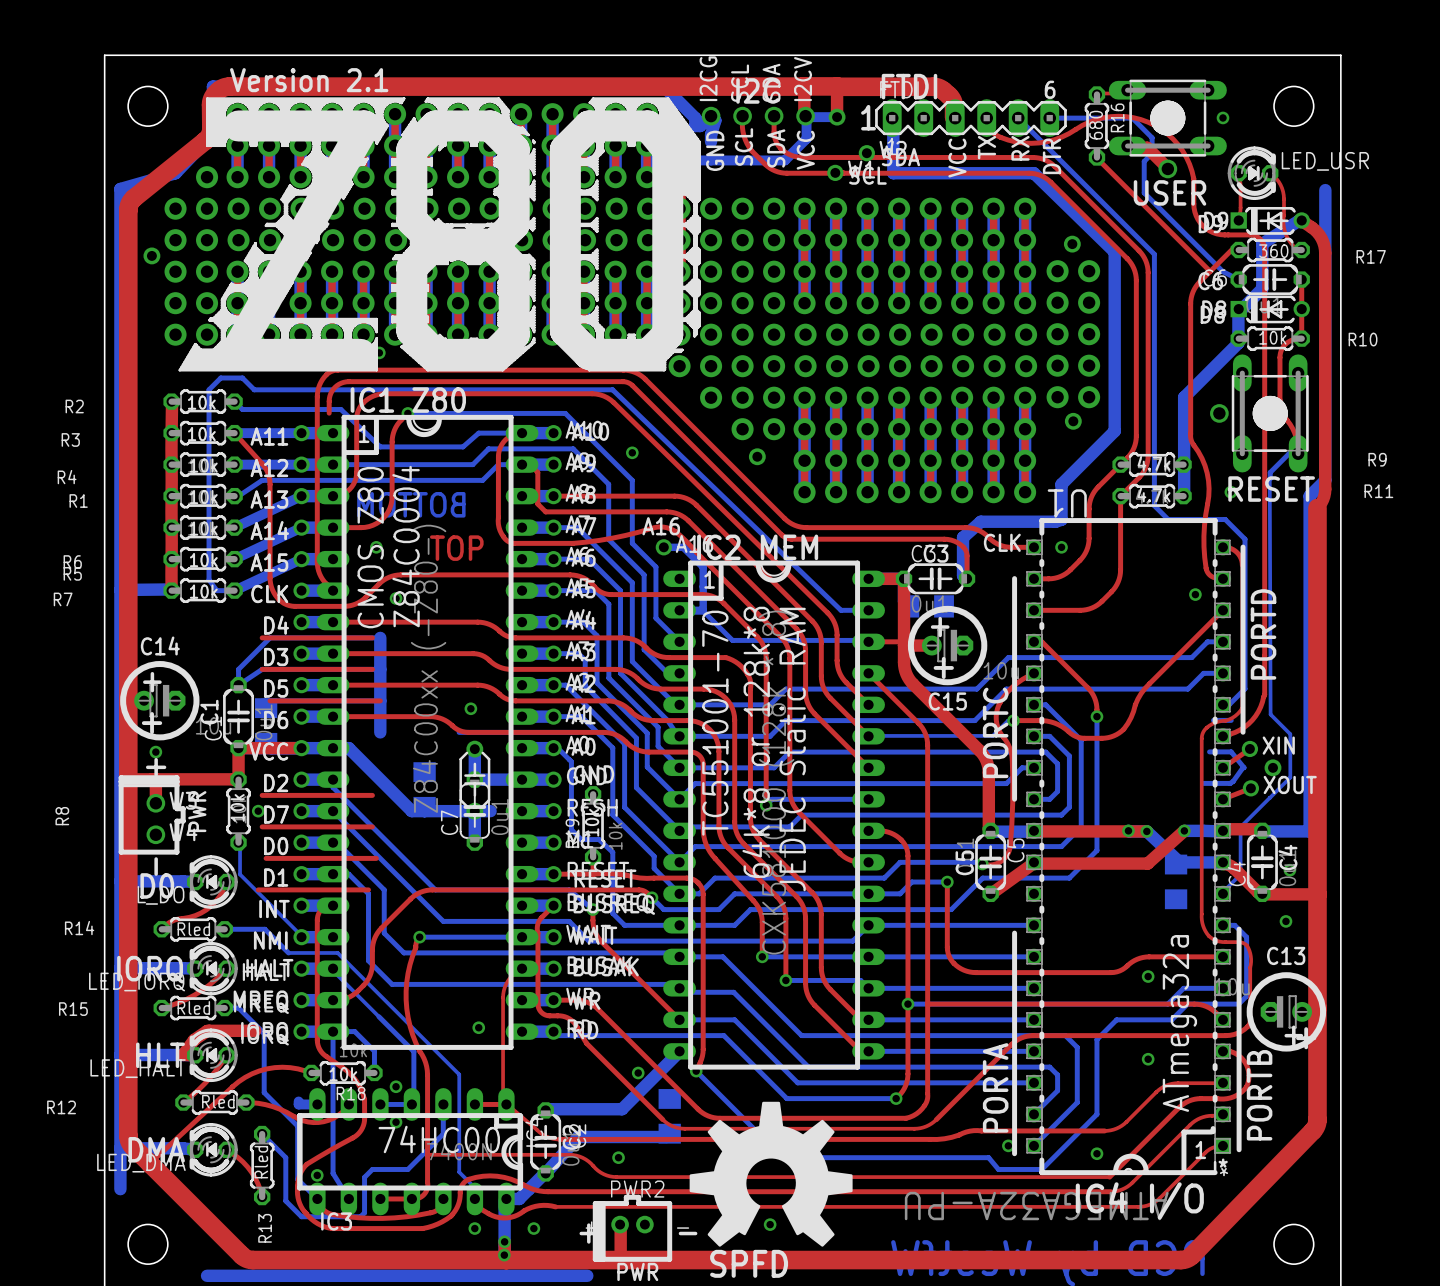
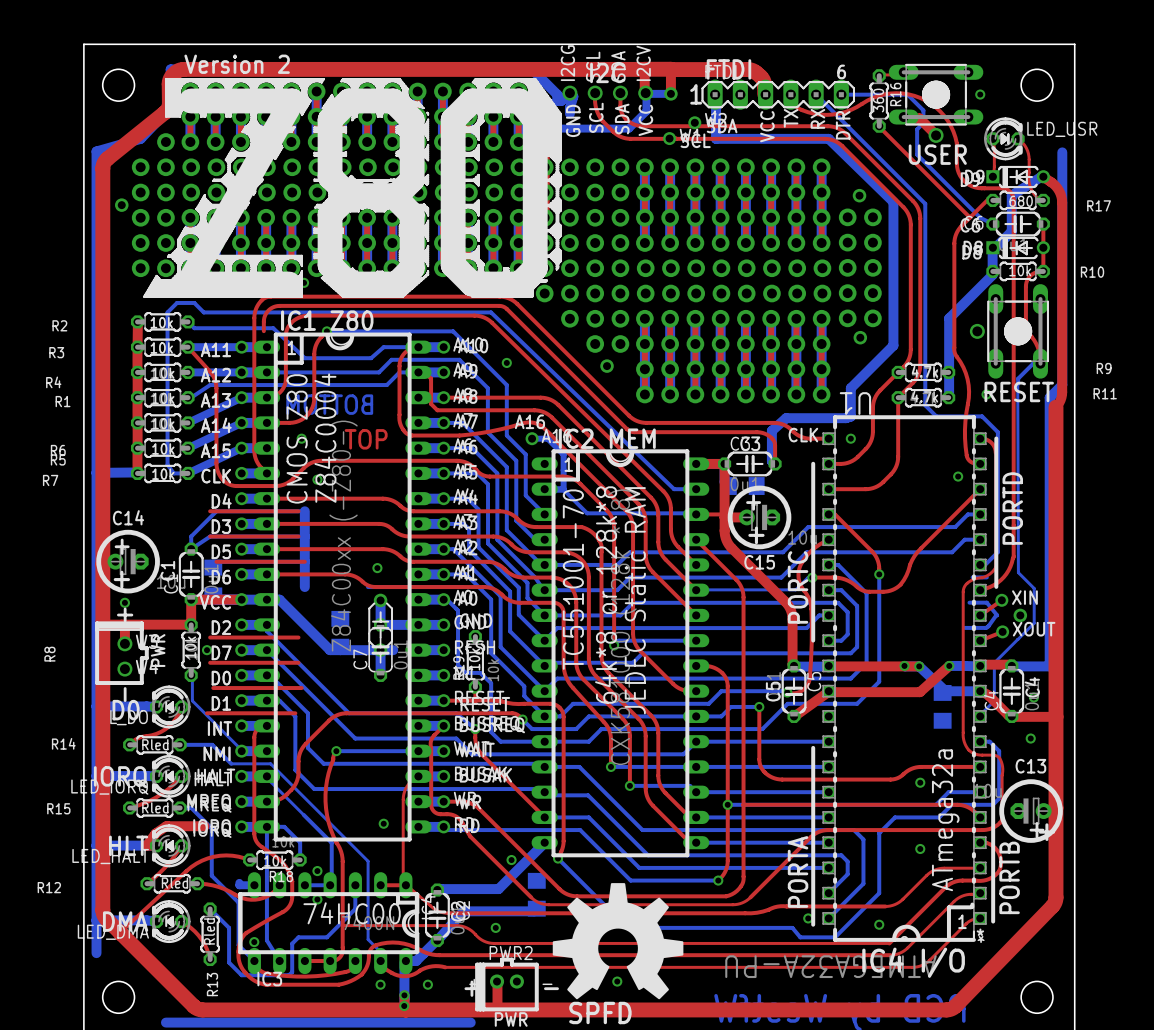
text: Version 2.1 (309, 80) -> Version 2 (237, 64)
R16 value: 680 (1096, 125) -> 360 (878, 100)
R17 value: 360 (1273, 251) -> 680 (1021, 201)

